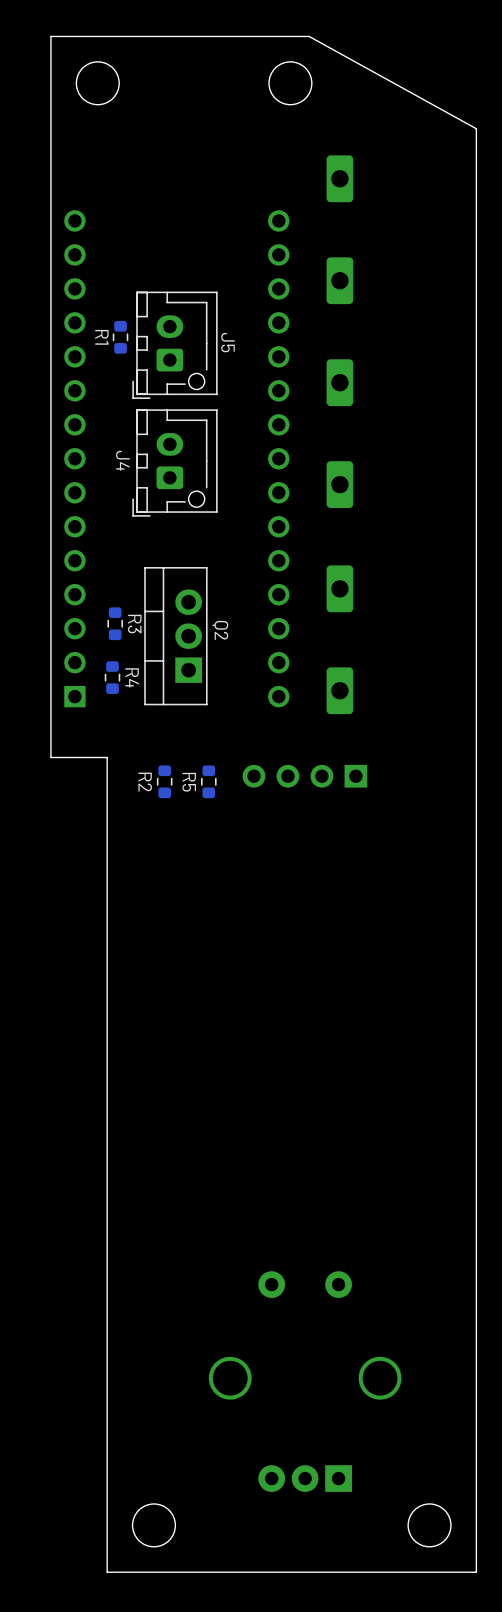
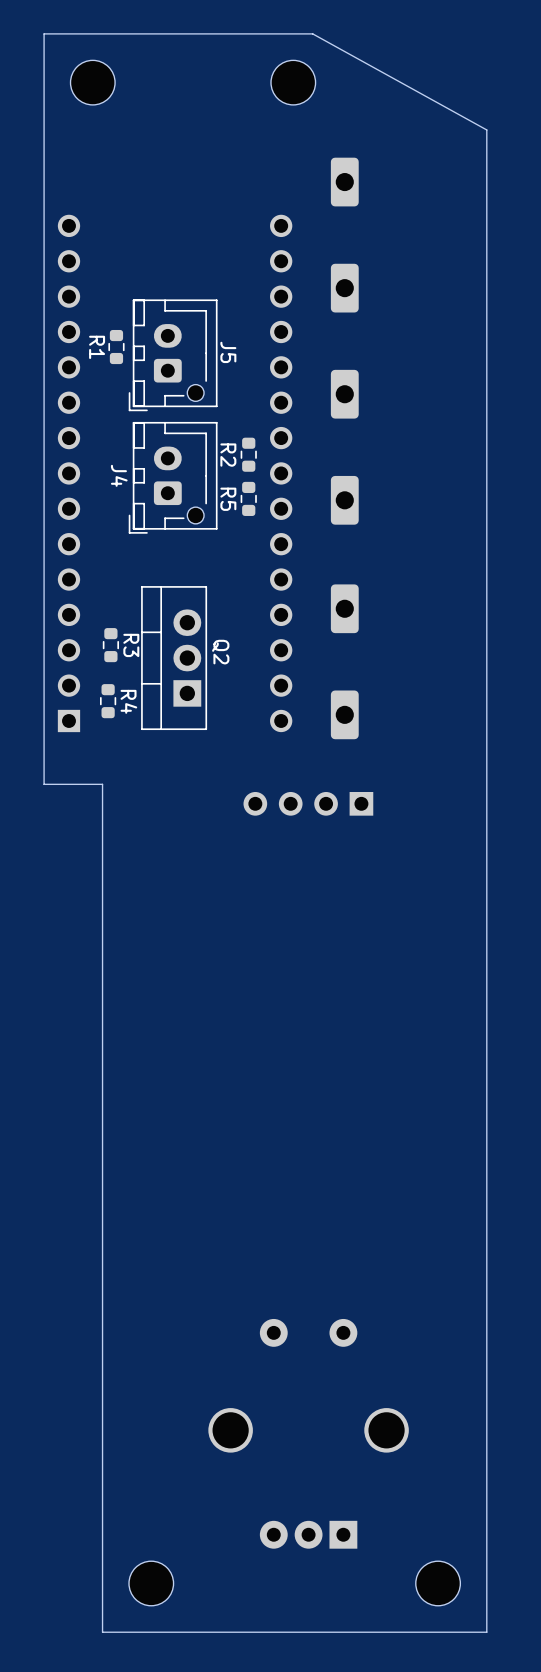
R2 position: (164, 781) -> (248, 454)
R5 position: (208, 781) -> (248, 498)

